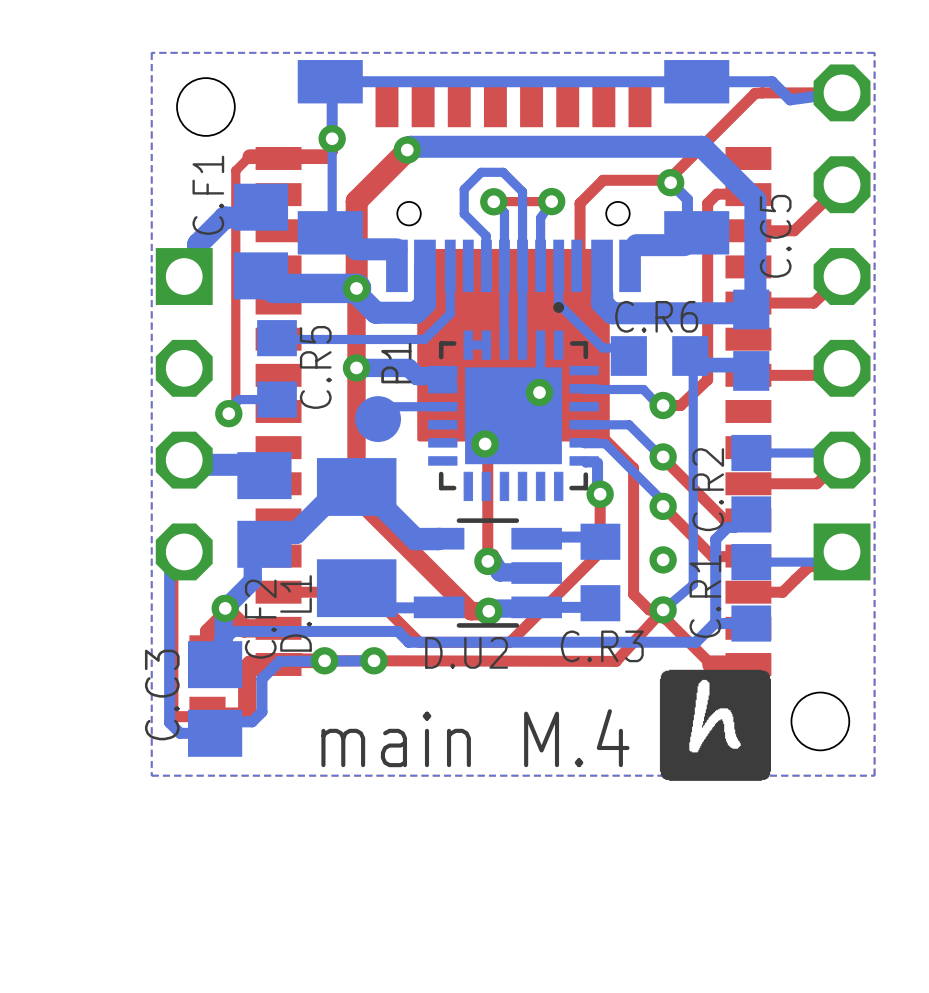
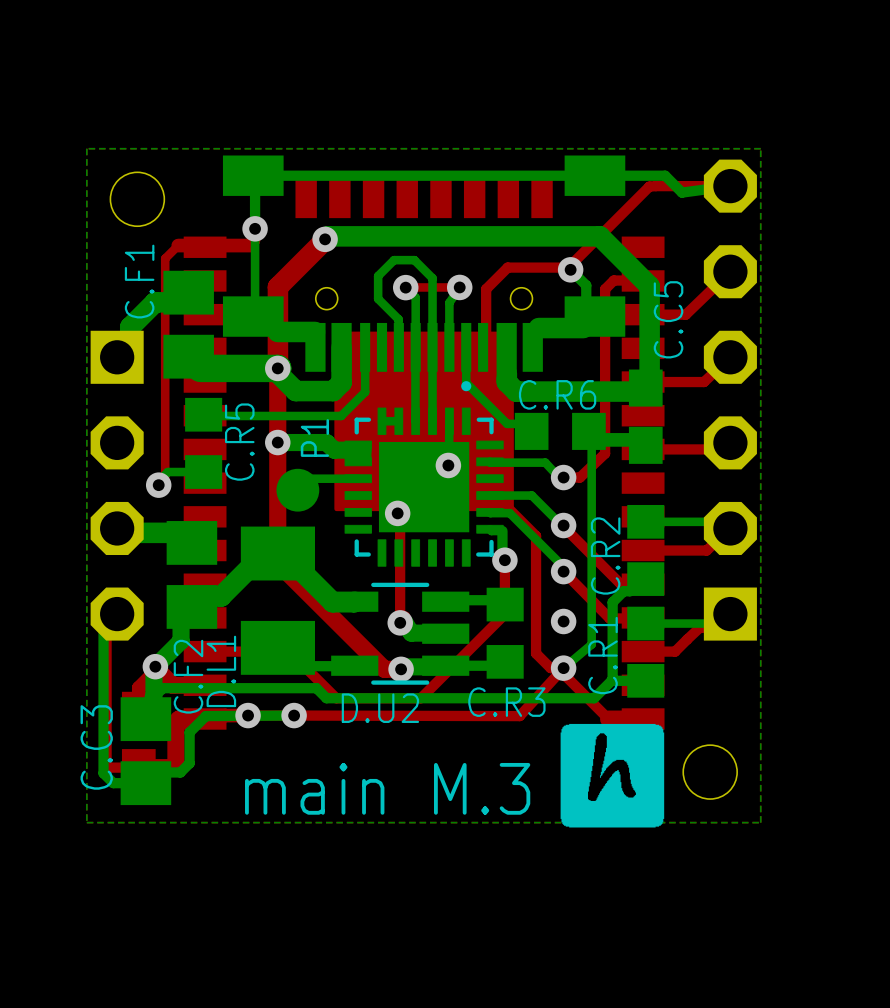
text: main M.4 (475, 738) -> main M.3 (387, 788)

